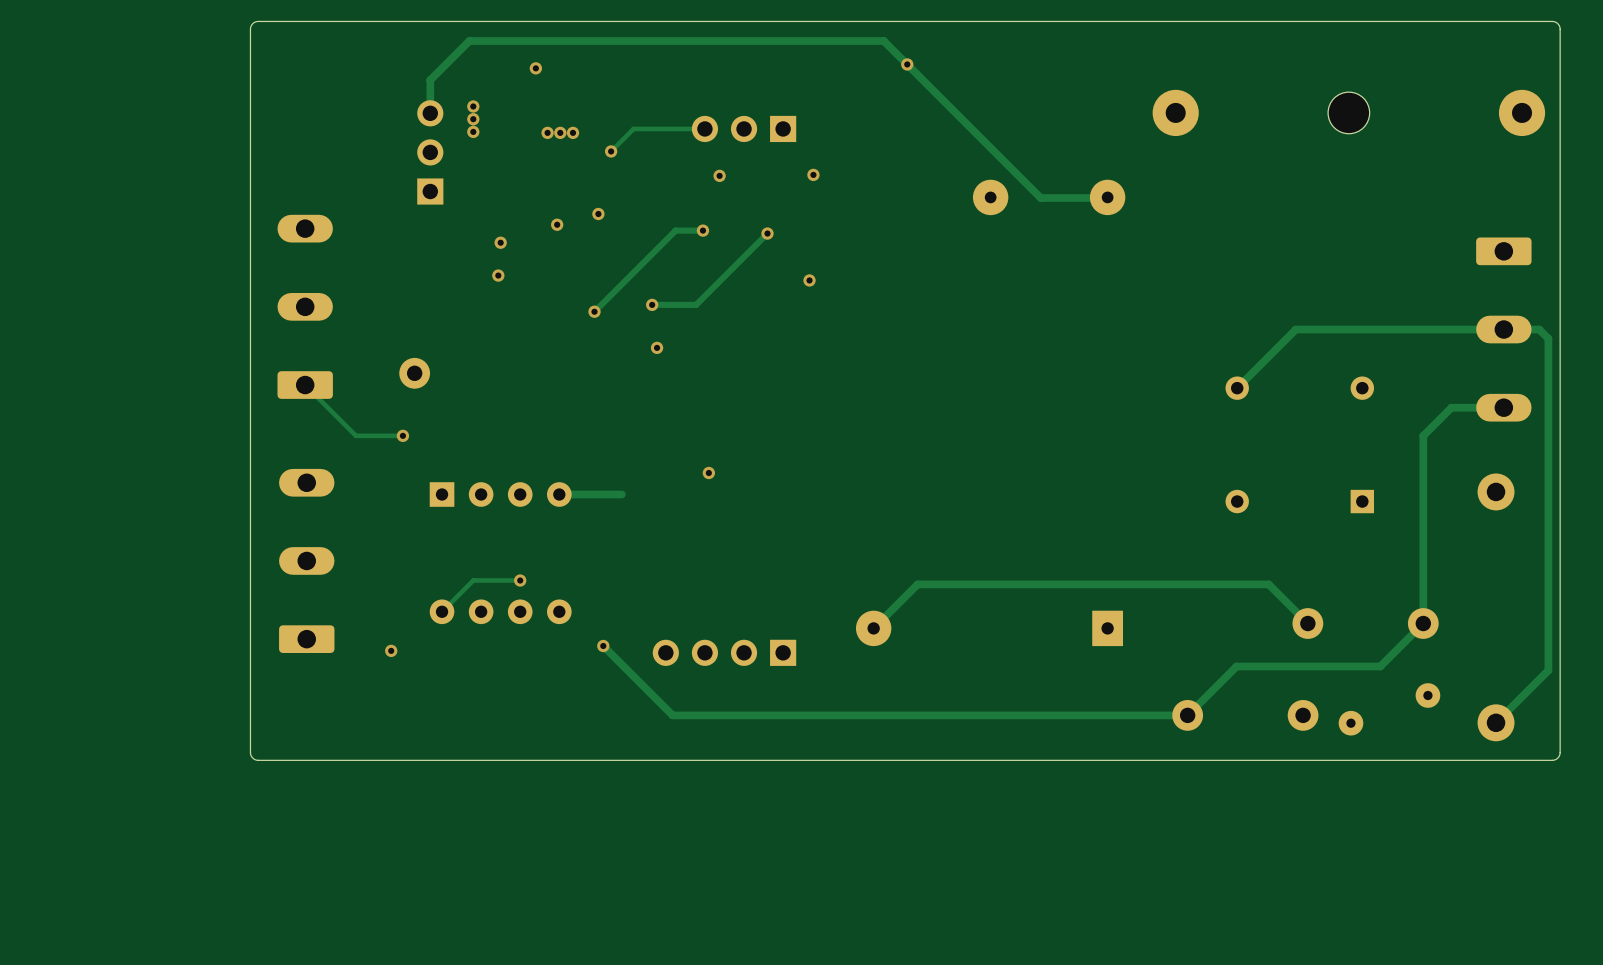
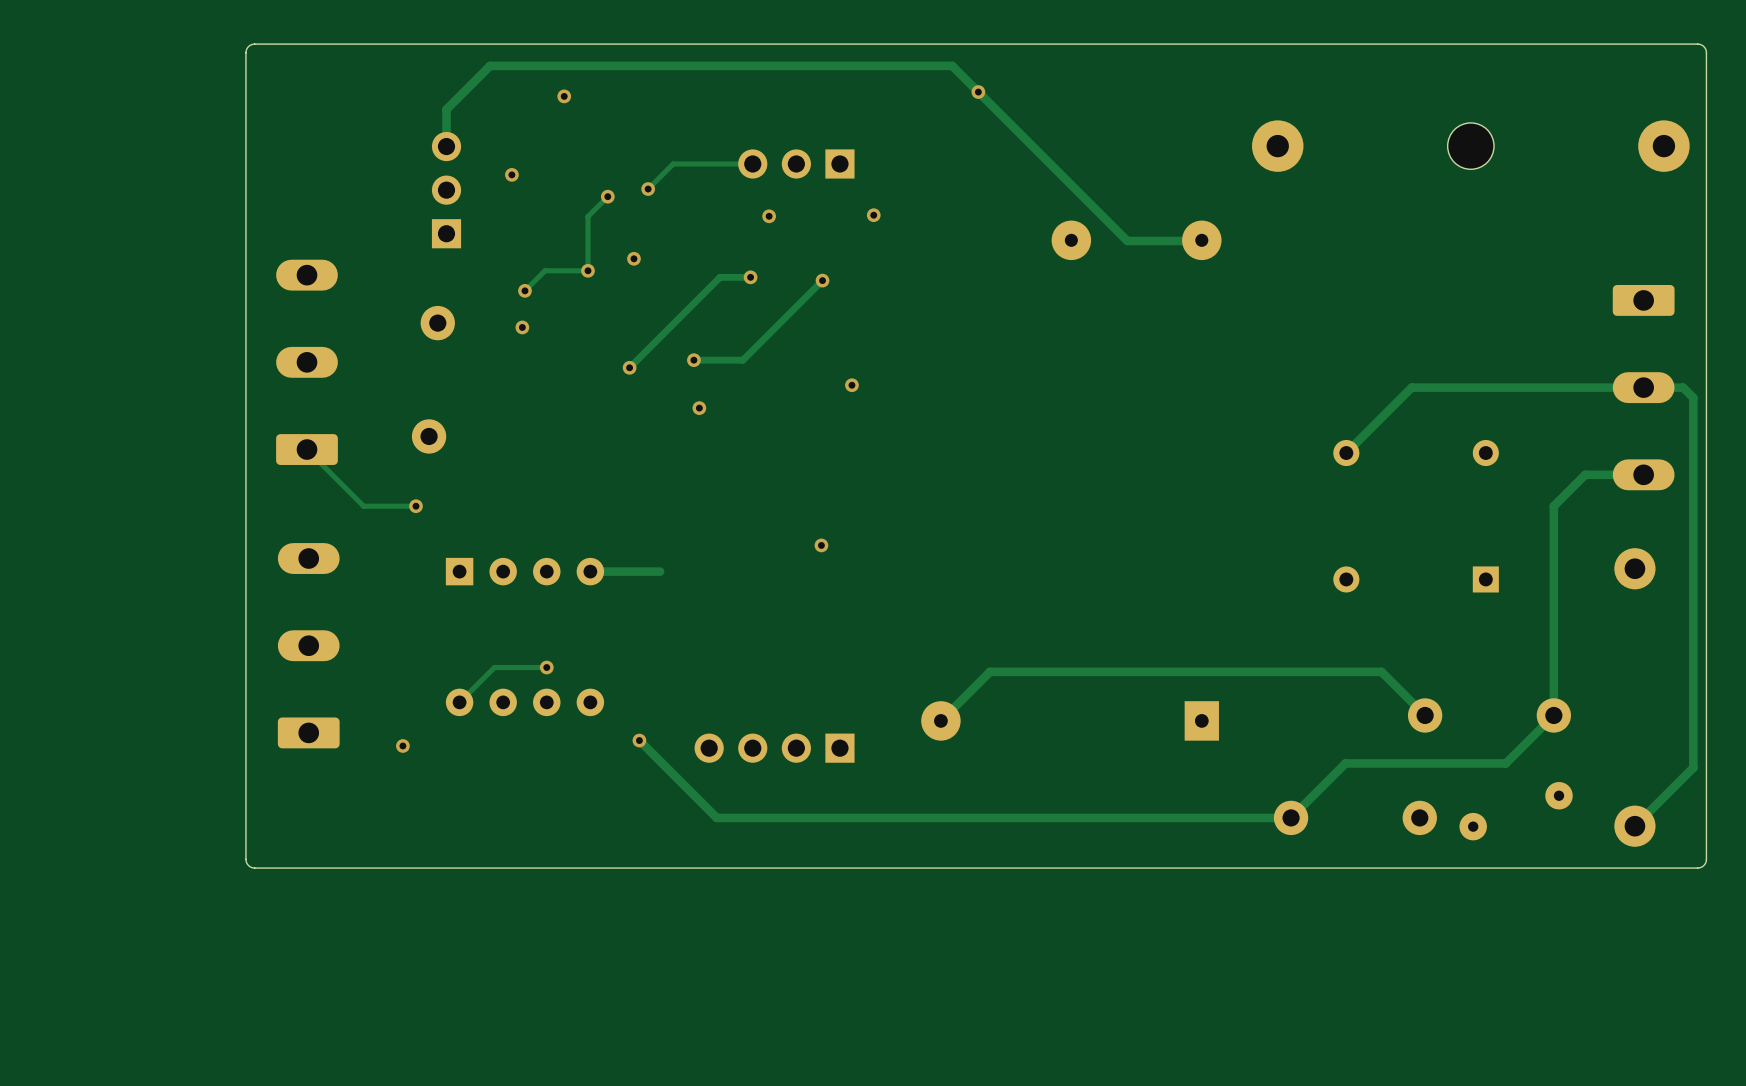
via: (473, 106) -> none
via: (473, 119) -> none
via: (473, 131) -> none
via: (547, 132) -> none
via: (560, 132) -> none
via: (572, 132) -> none
via: none -> (511, 174)
track: none -> (607, 196) (587, 216) (587, 270) (545, 270) (524, 290)
via: none -> (607, 196)
part: none -> (437, 323)
via position: (809, 280) -> (851, 385)
via position: (708, 473) -> (821, 545)

